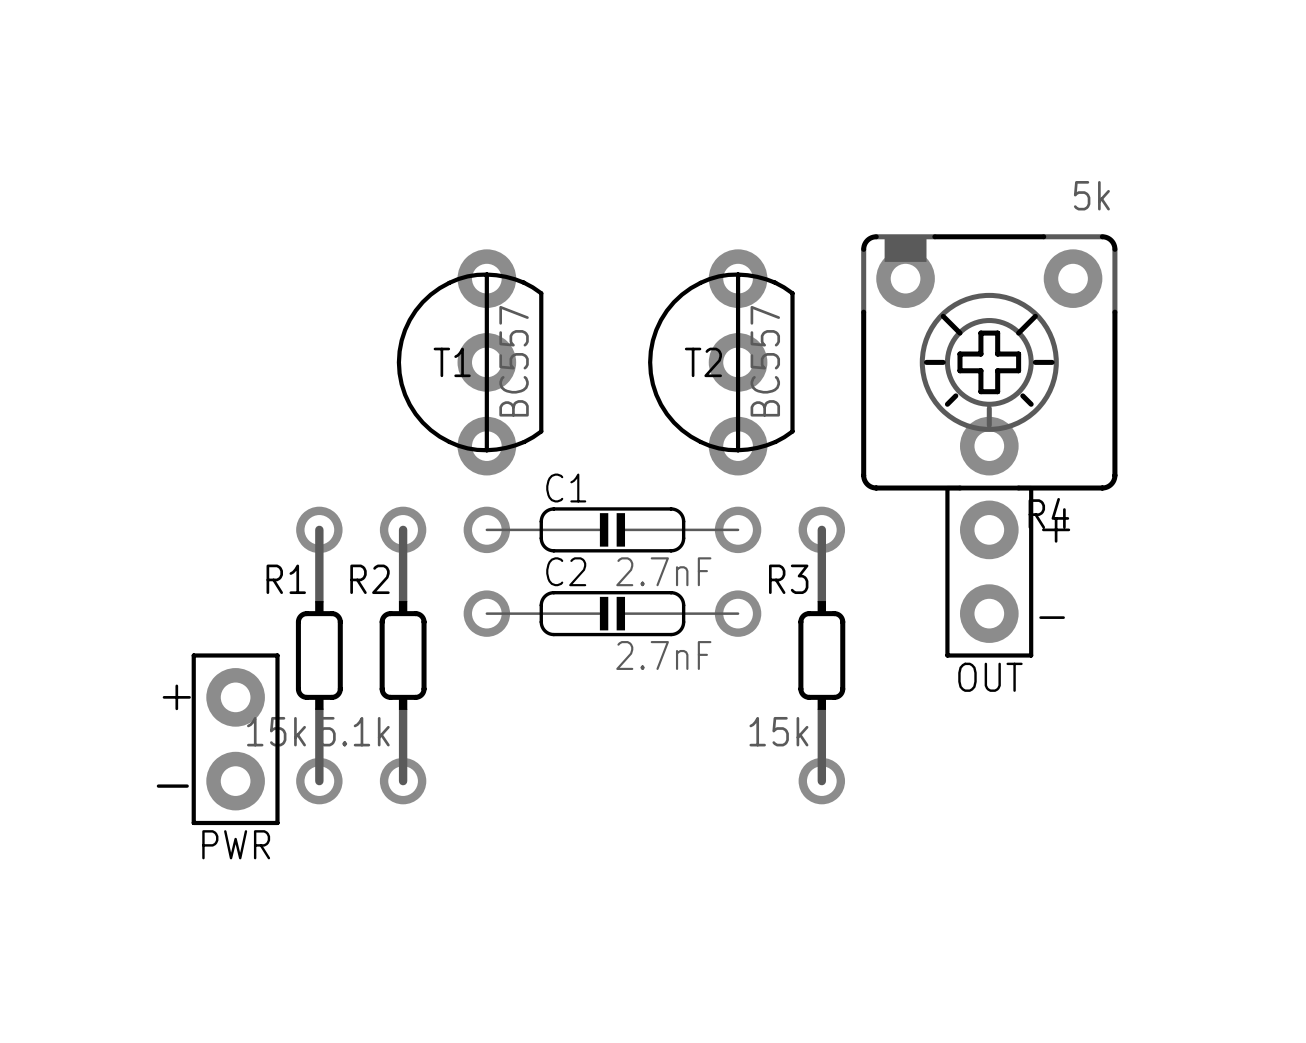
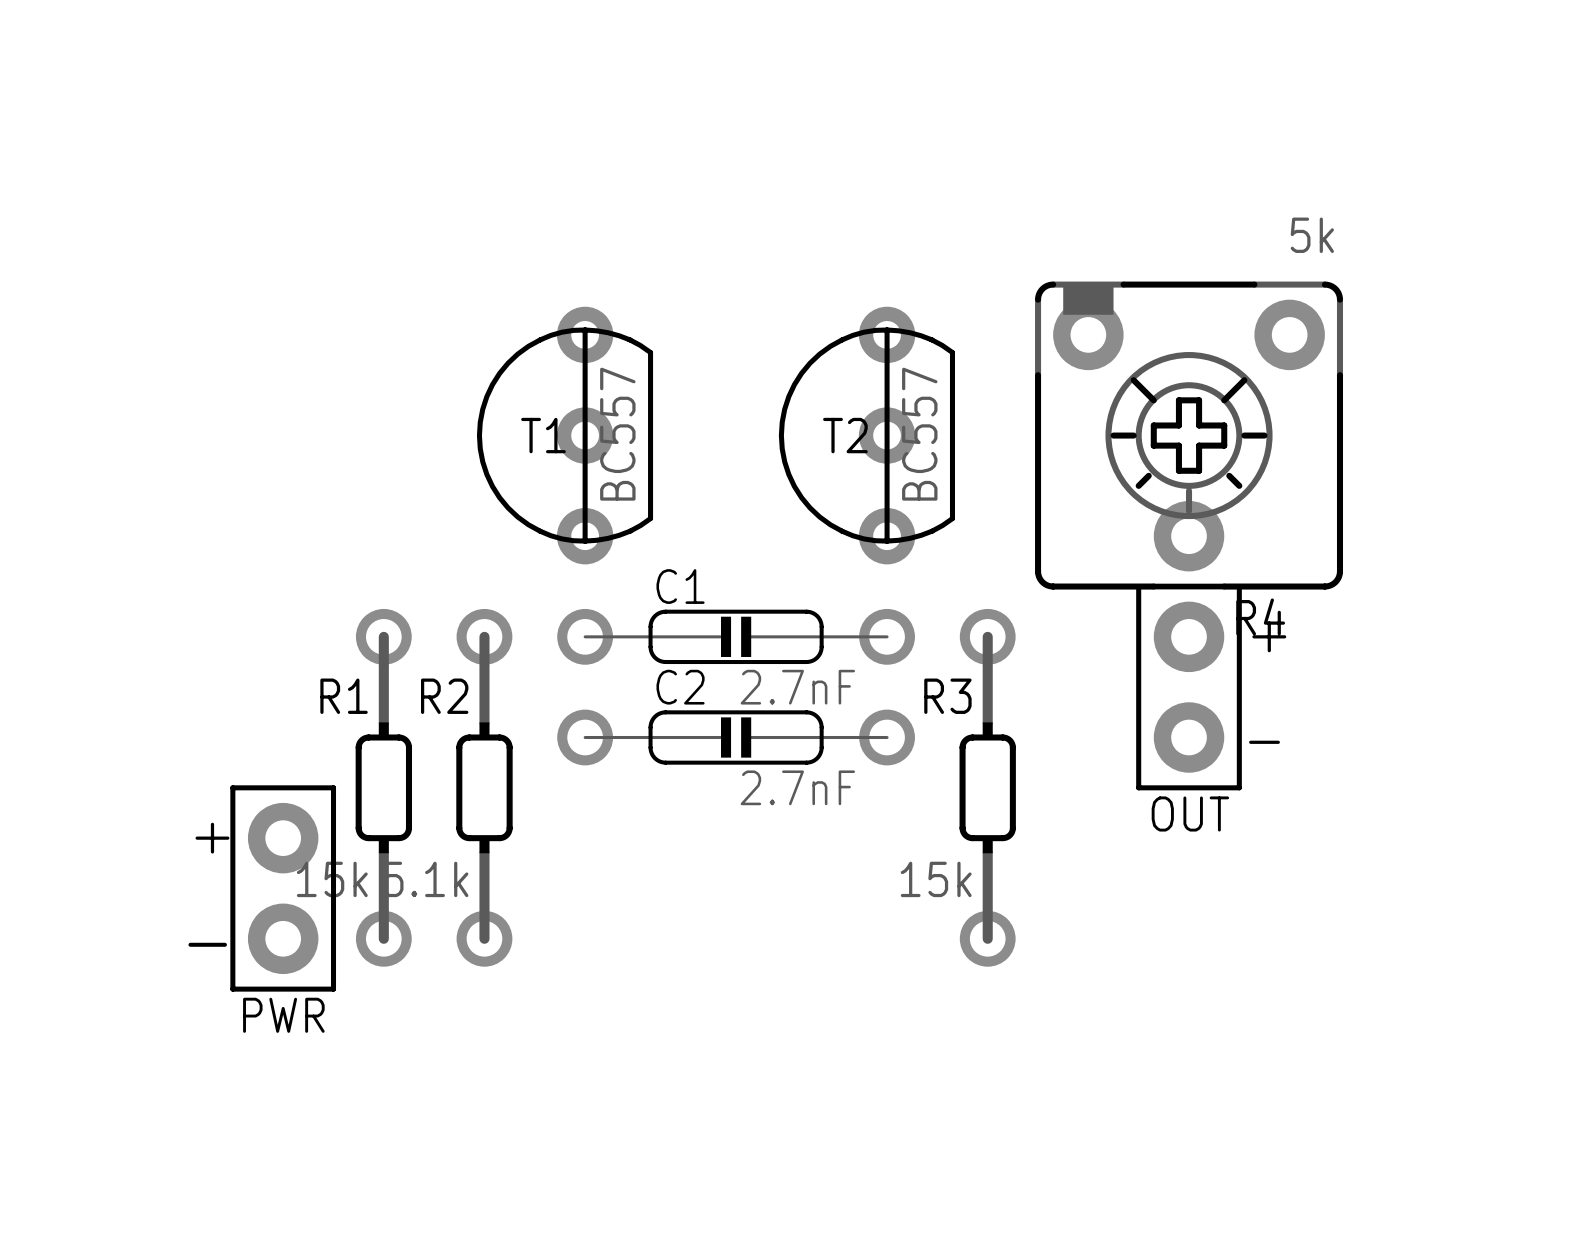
T1 footprint: [396, 249, 544, 476] -> [476, 306, 654, 565]
T2 footprint: [648, 249, 795, 476] -> [778, 306, 956, 565]

